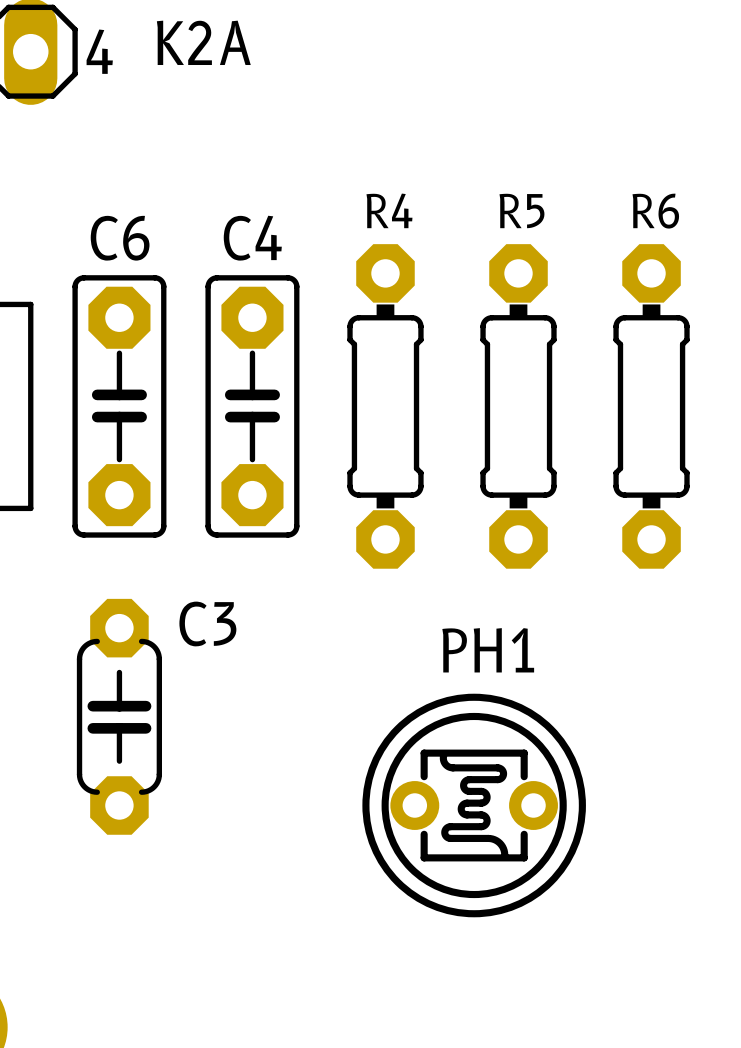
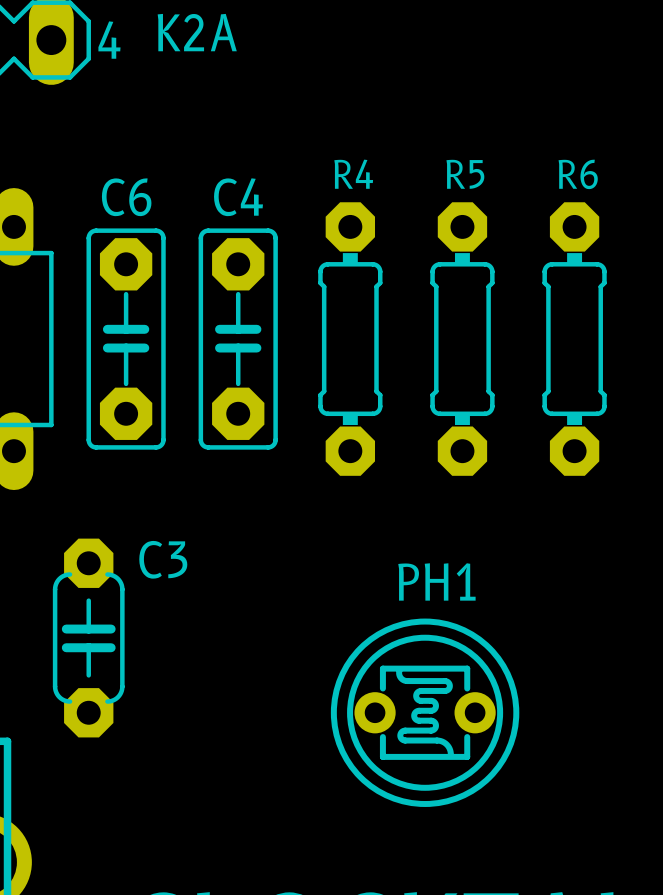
C3 position: (119, 716) -> (88, 638)
PH1 position: (474, 805) -> (425, 712)

